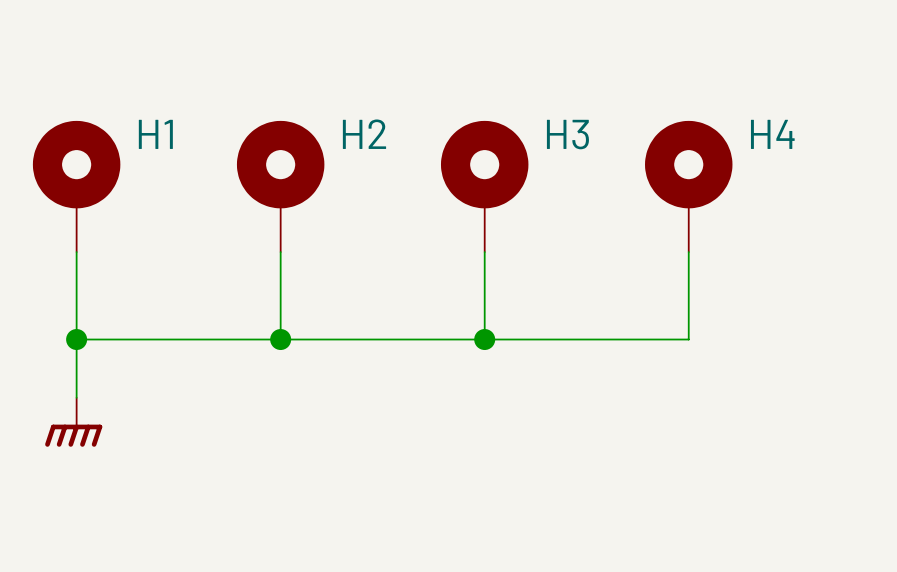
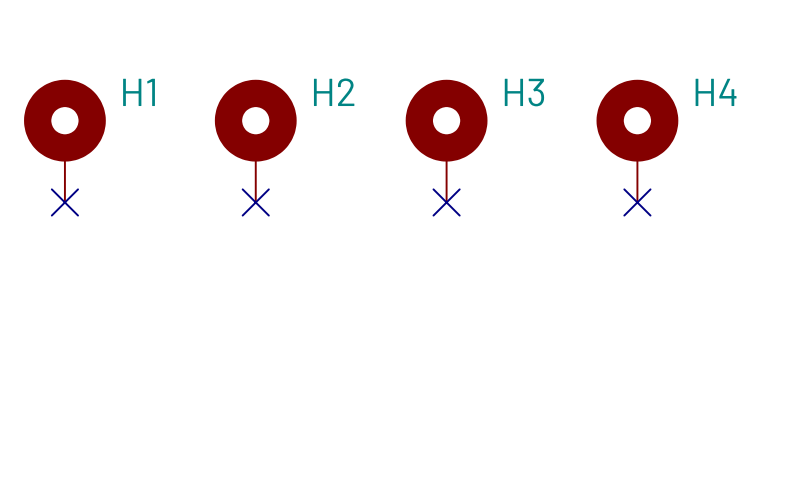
wire: (76, 252) (76, 397) -> none
no-connect mark: none -> (64, 202)
wire: (280, 252) (280, 339) -> none
no-connect mark: none -> (255, 202)
wire: (484, 252) (484, 339) -> none
no-connect mark: none -> (446, 202)
wire: (688, 252) (688, 339) (76, 339) -> none
no-connect mark: none -> (637, 202)
junction: (76, 339) -> none
junction: (280, 339) -> none
junction: (484, 339) -> none
power symbol: (73, 422) -> none

